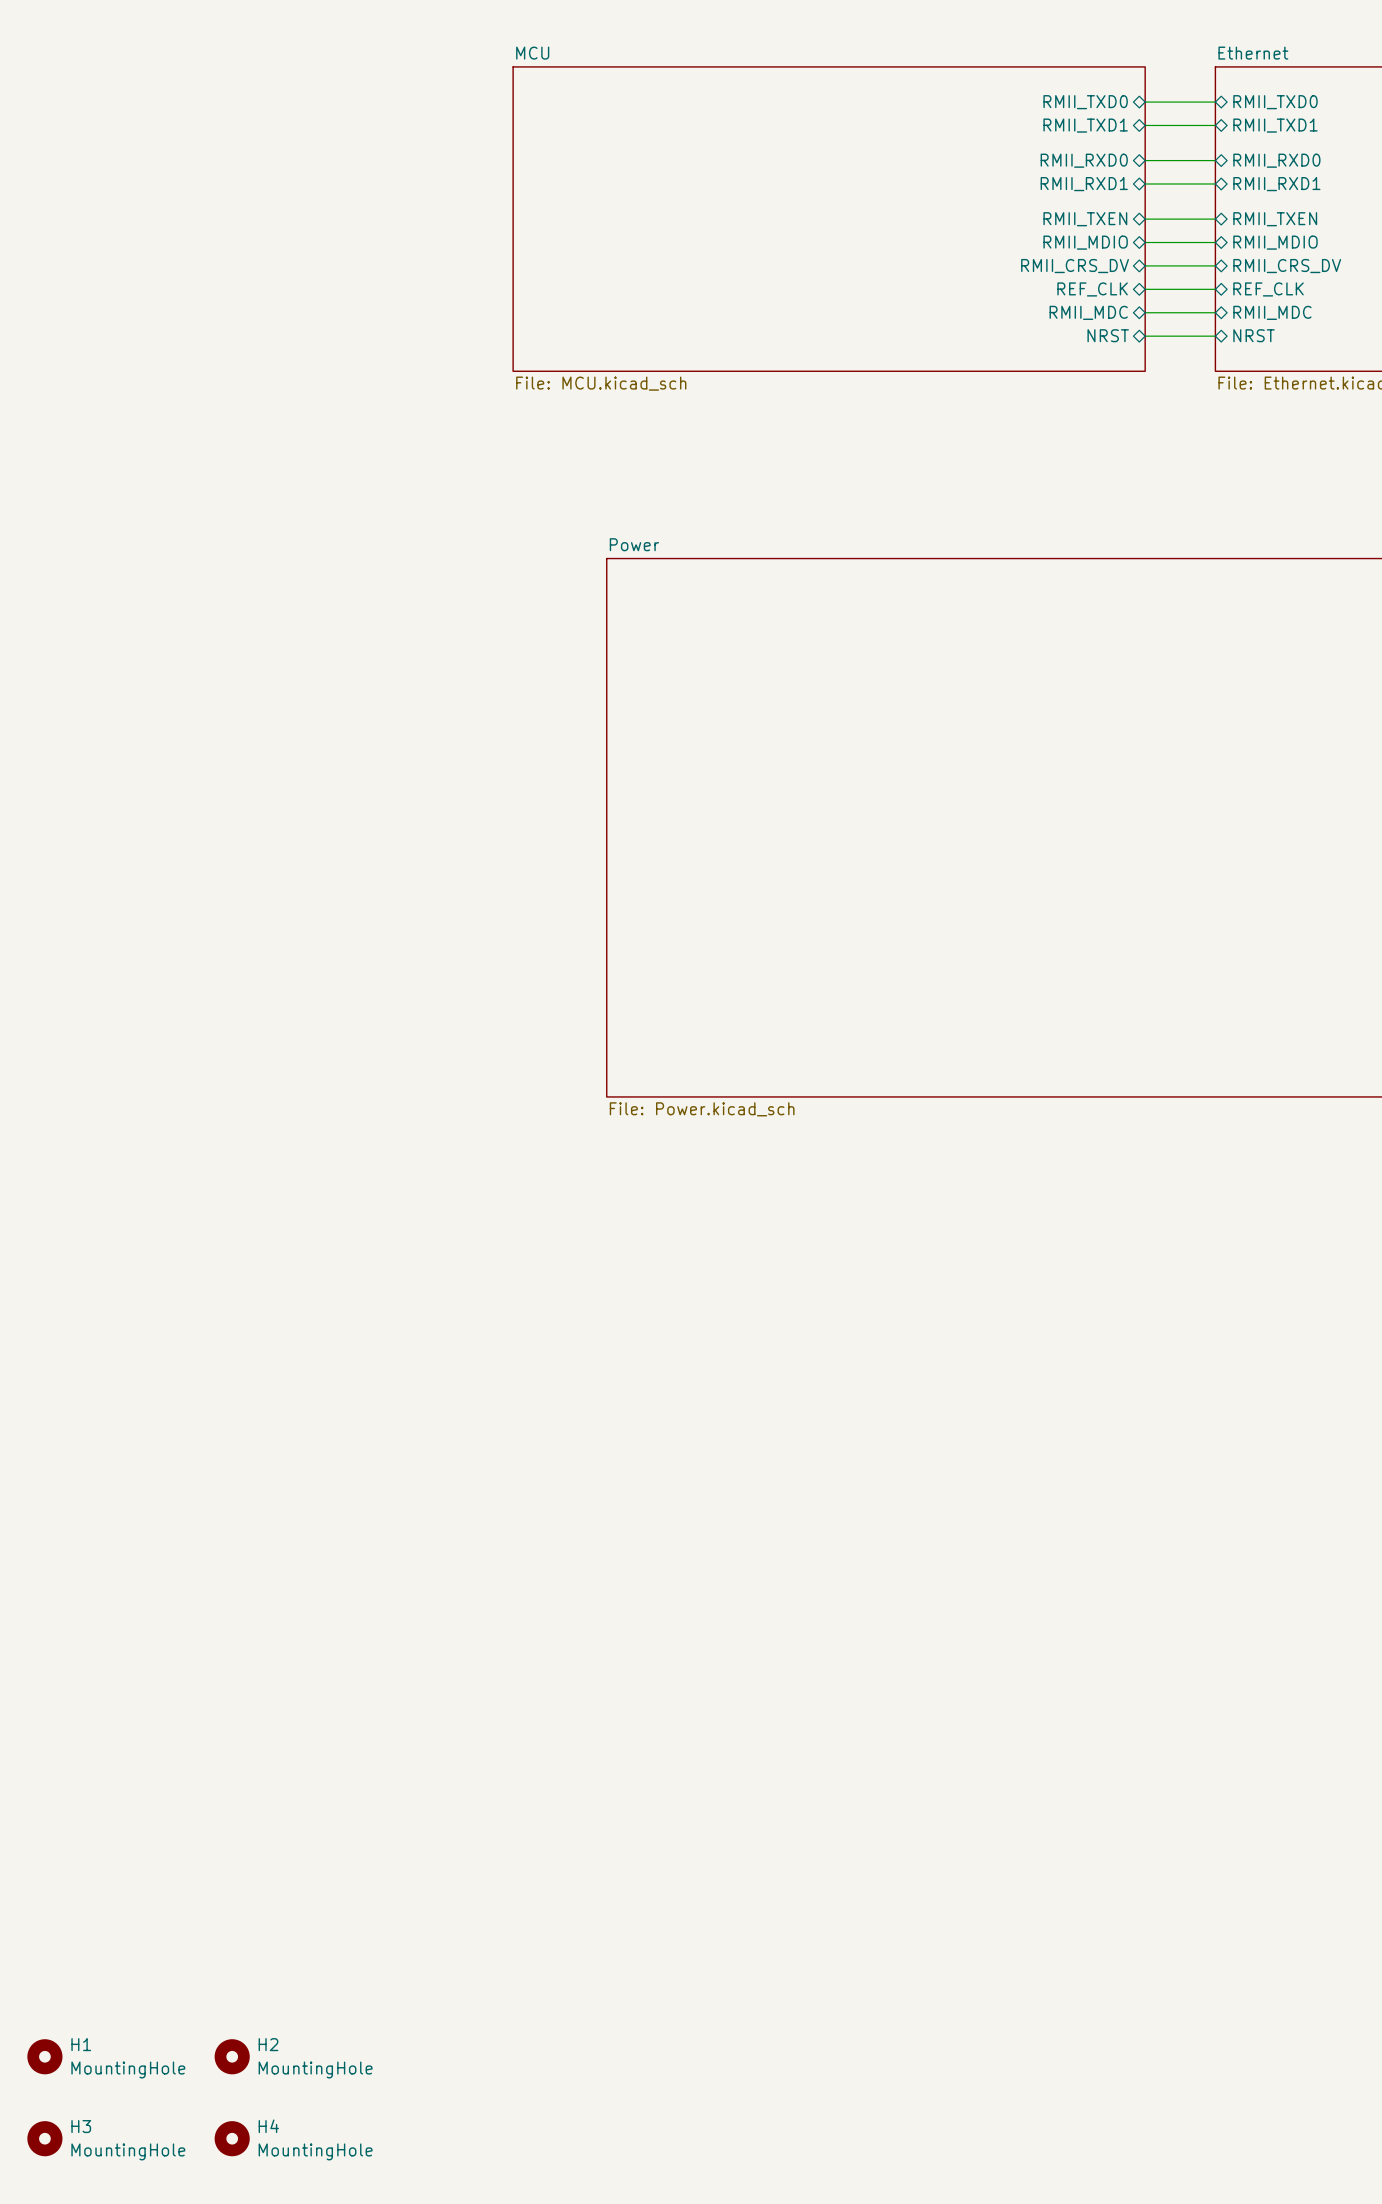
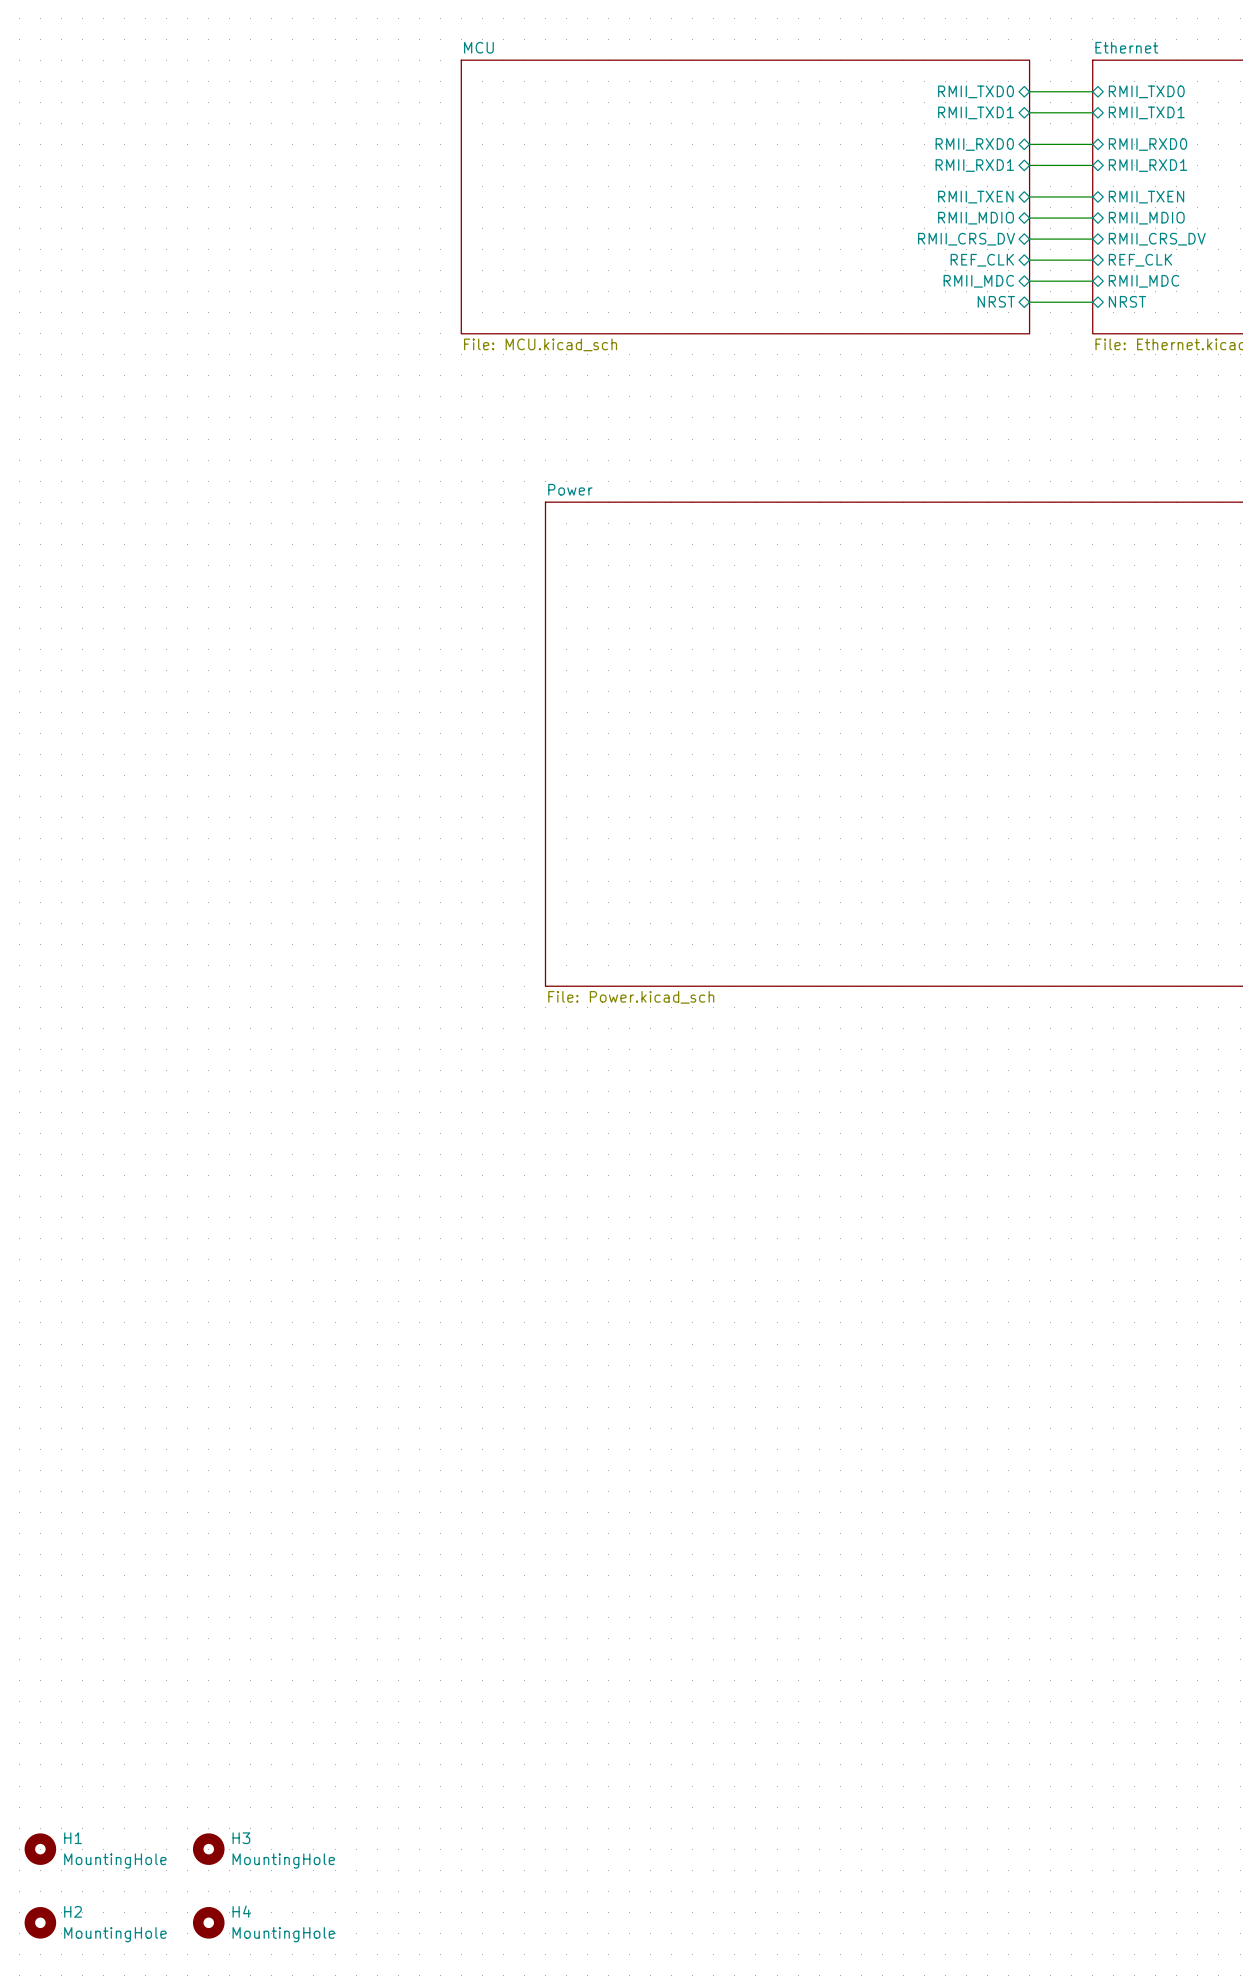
H2 name: H2 (268, 2044) -> H3 (241, 1838)
H3 name: H3 (81, 2126) -> H2 (73, 1911)

